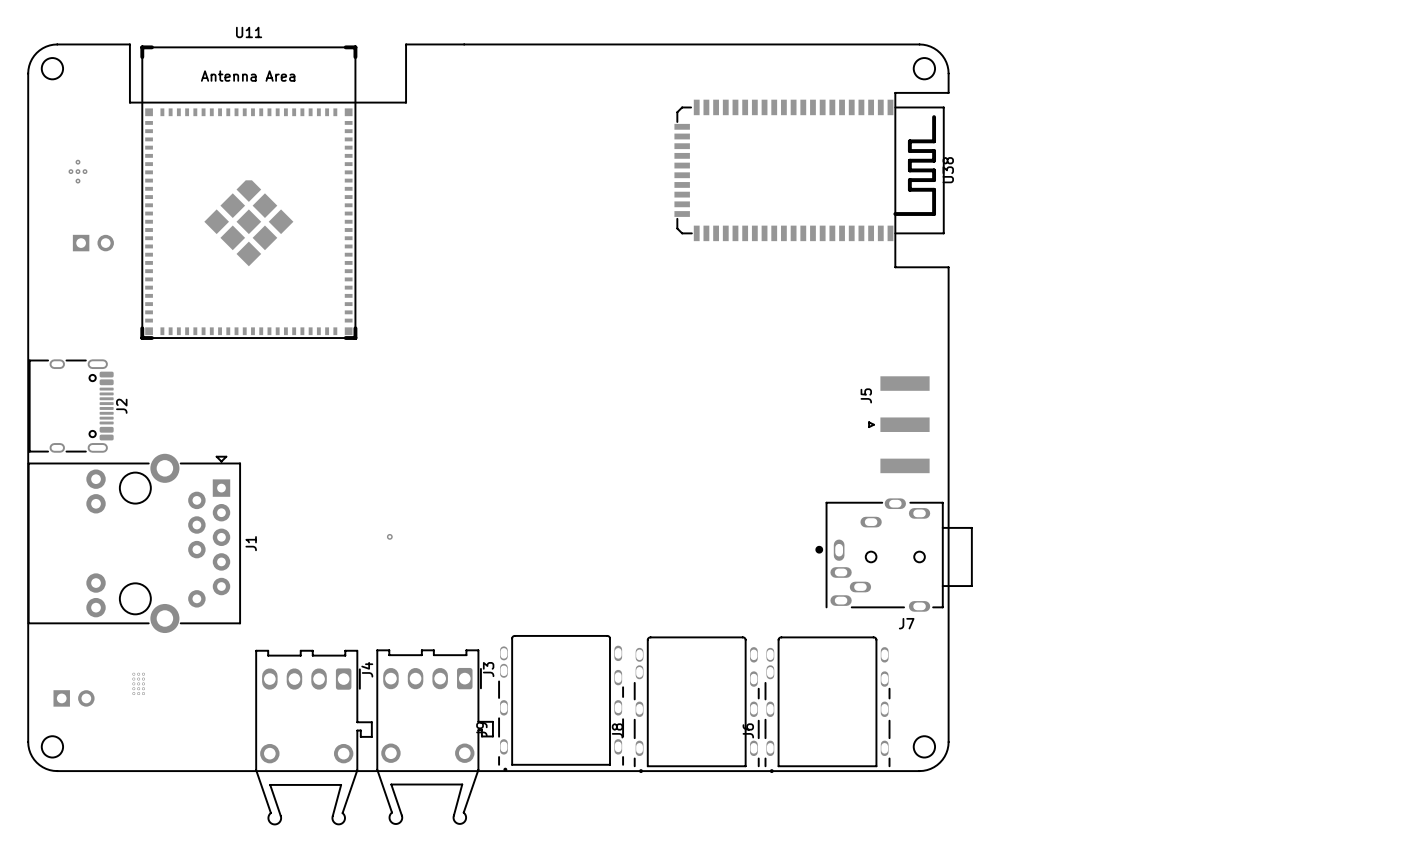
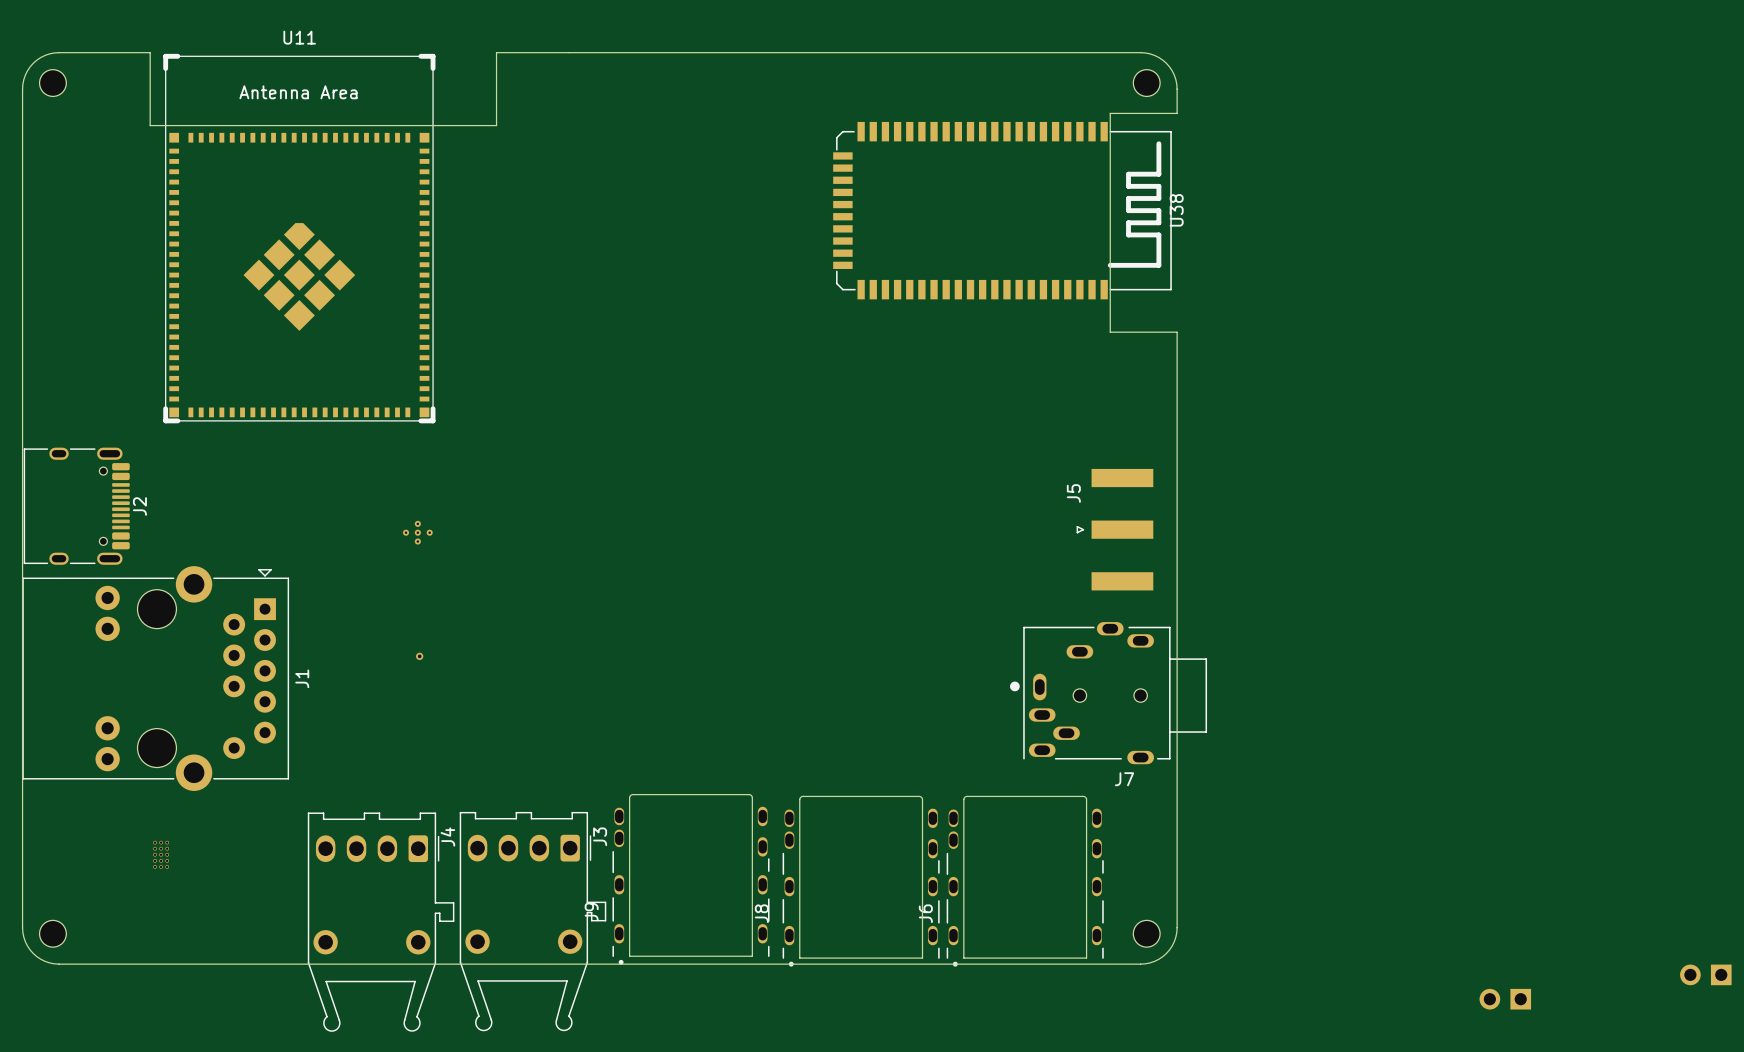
part: (77, 171) -> none
part: (93, 243) -> none
part: none -> (417, 532)
part position: (389, 536) -> (419, 656)
part: (74, 698) -> none
part: none -> (1705, 974)
part: none -> (1505, 999)

